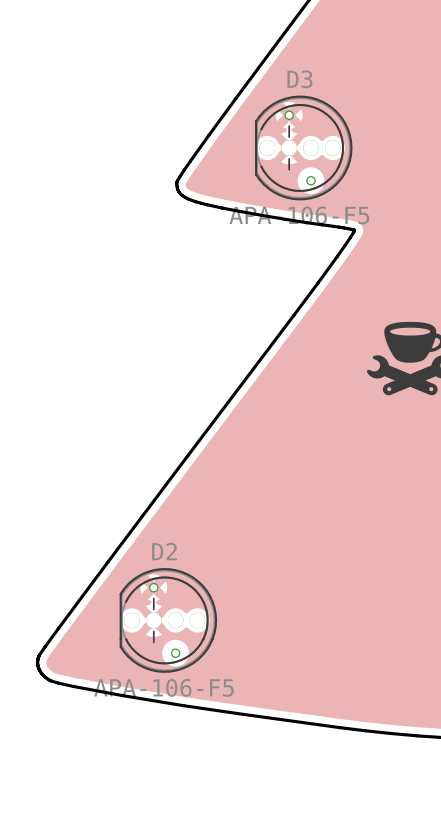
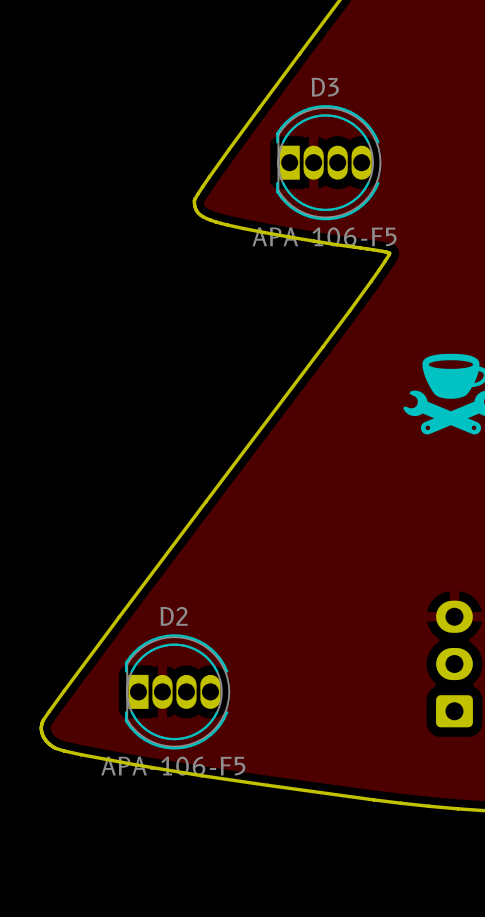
D3 footprint: [255, 95, 353, 201] -> [276, 105, 382, 221]
D2 footprint: [119, 568, 218, 673] -> [124, 634, 231, 750]
part: none -> (454, 664)

